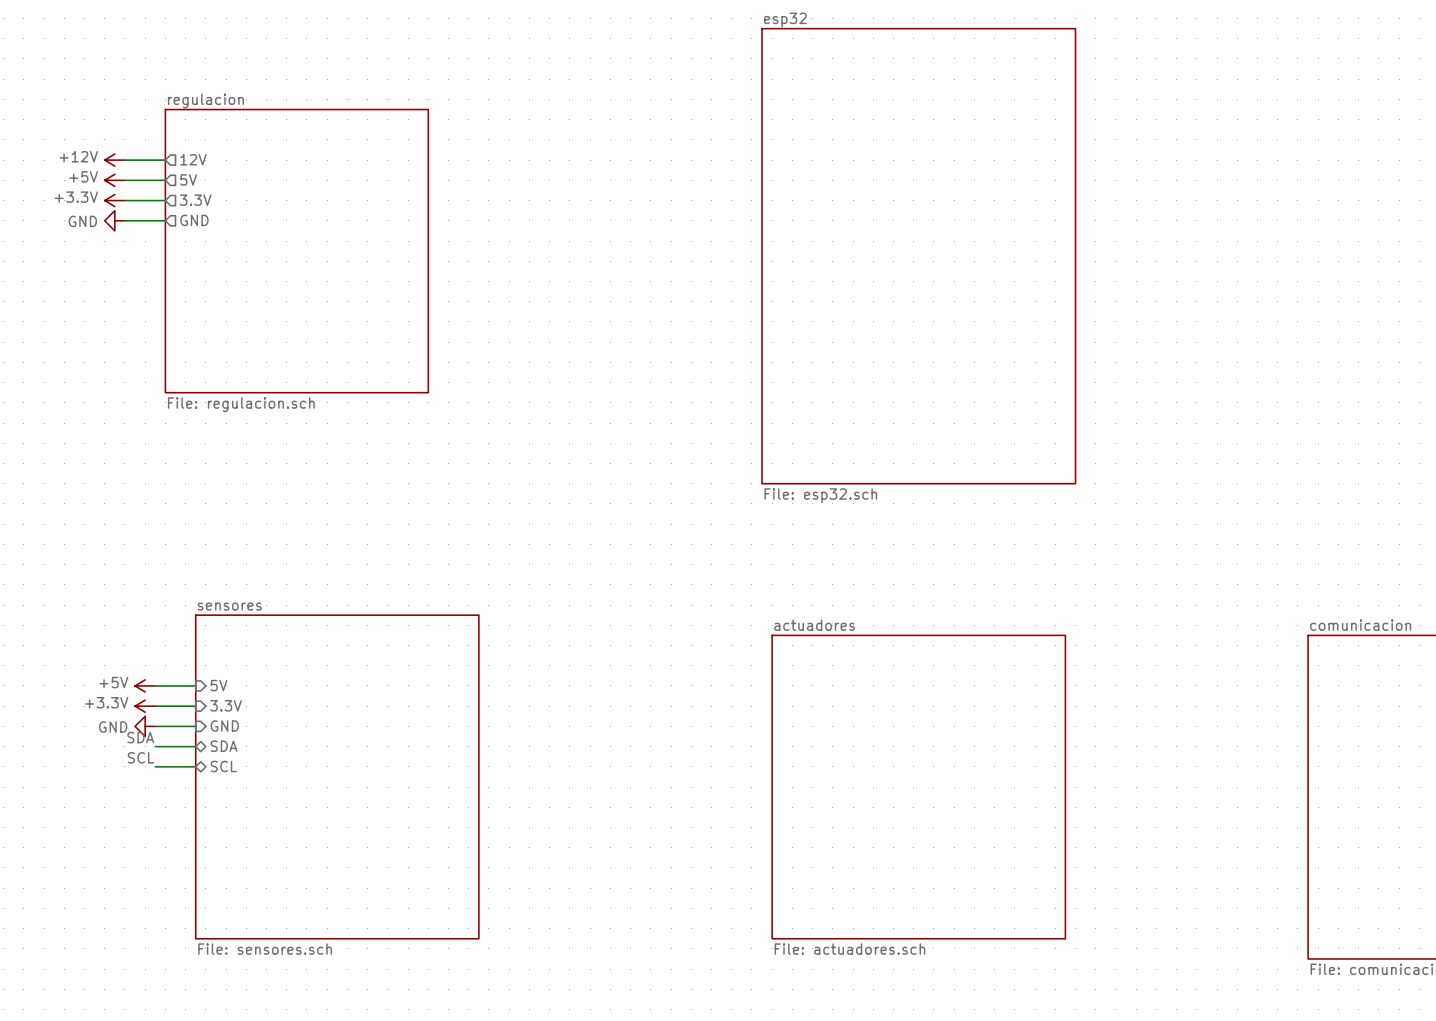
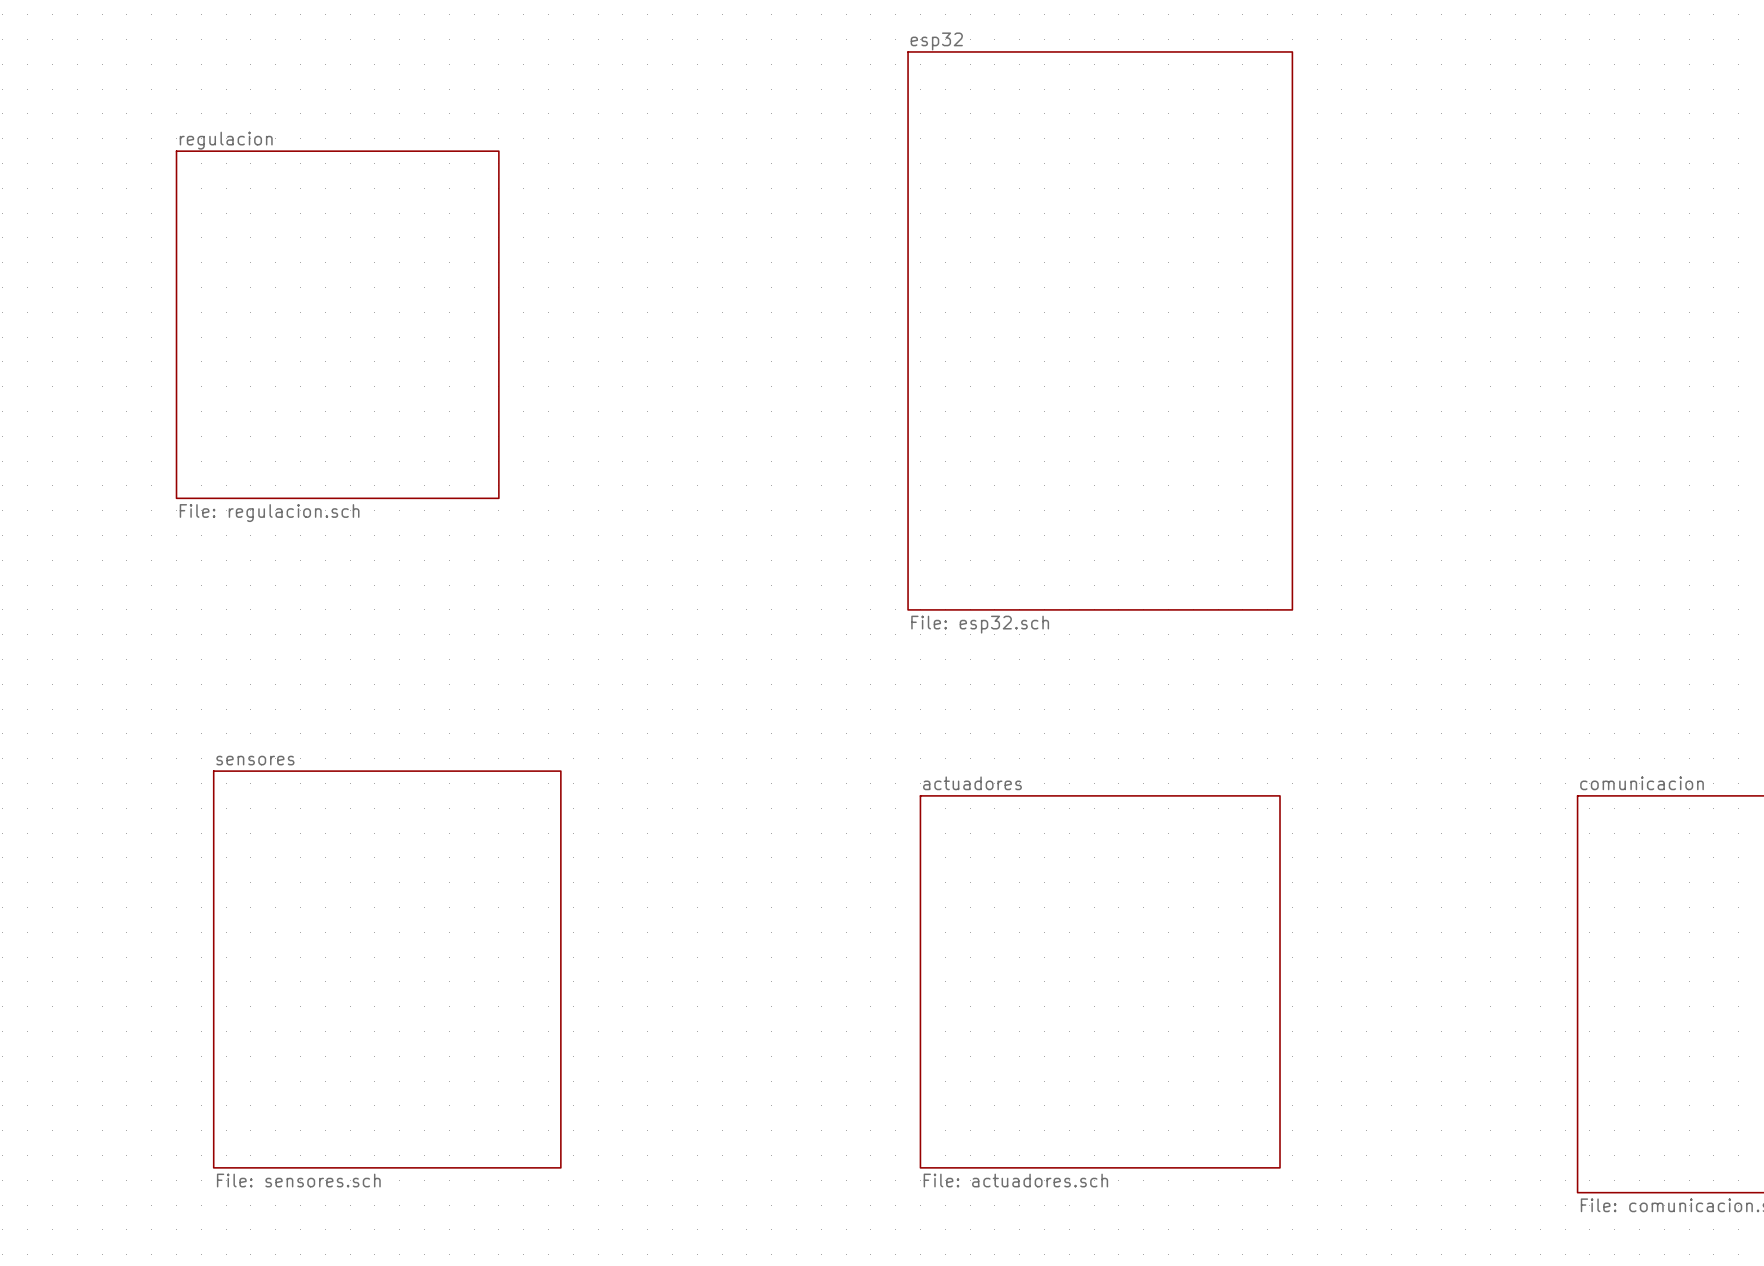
sheet pin: 12V (193, 159) -> none
power symbol: +12V (114, 160) -> none
wire: (124, 160) (165, 160) -> none
sheet pin: 5V (188, 179) -> none
power symbol: +5V (114, 180) -> none
wire: (124, 180) (165, 180) -> none
power symbol: +3.3V (114, 200) -> none
wire: (124, 200) (165, 200) -> none
sheet pin: 3.3V (195, 200) -> none
power symbol: GND (114, 220) -> none
wire: (124, 220) (165, 220) -> none
sheet pin: GND (194, 220) -> none
power symbol: +5V (145, 685) -> none
wire: (155, 685) (195, 685) -> none
sheet pin: 5V (219, 685) -> none
sheet pin: 3.3V (225, 705) -> none
power symbol: +3.3V (145, 706) -> none
wire: (155, 706) (195, 706) -> none
power symbol: GND (145, 726) -> none
wire: (155, 726) (195, 726) -> none
sheet pin: GND (224, 726) -> none
label: SDA (140, 737) -> none
wire: (155, 746) (195, 746) -> none
sheet pin: SDA (224, 746) -> none
label: SCL (141, 757) -> none
wire: (155, 766) (195, 766) -> none
sheet pin: SCL (223, 766) -> none

